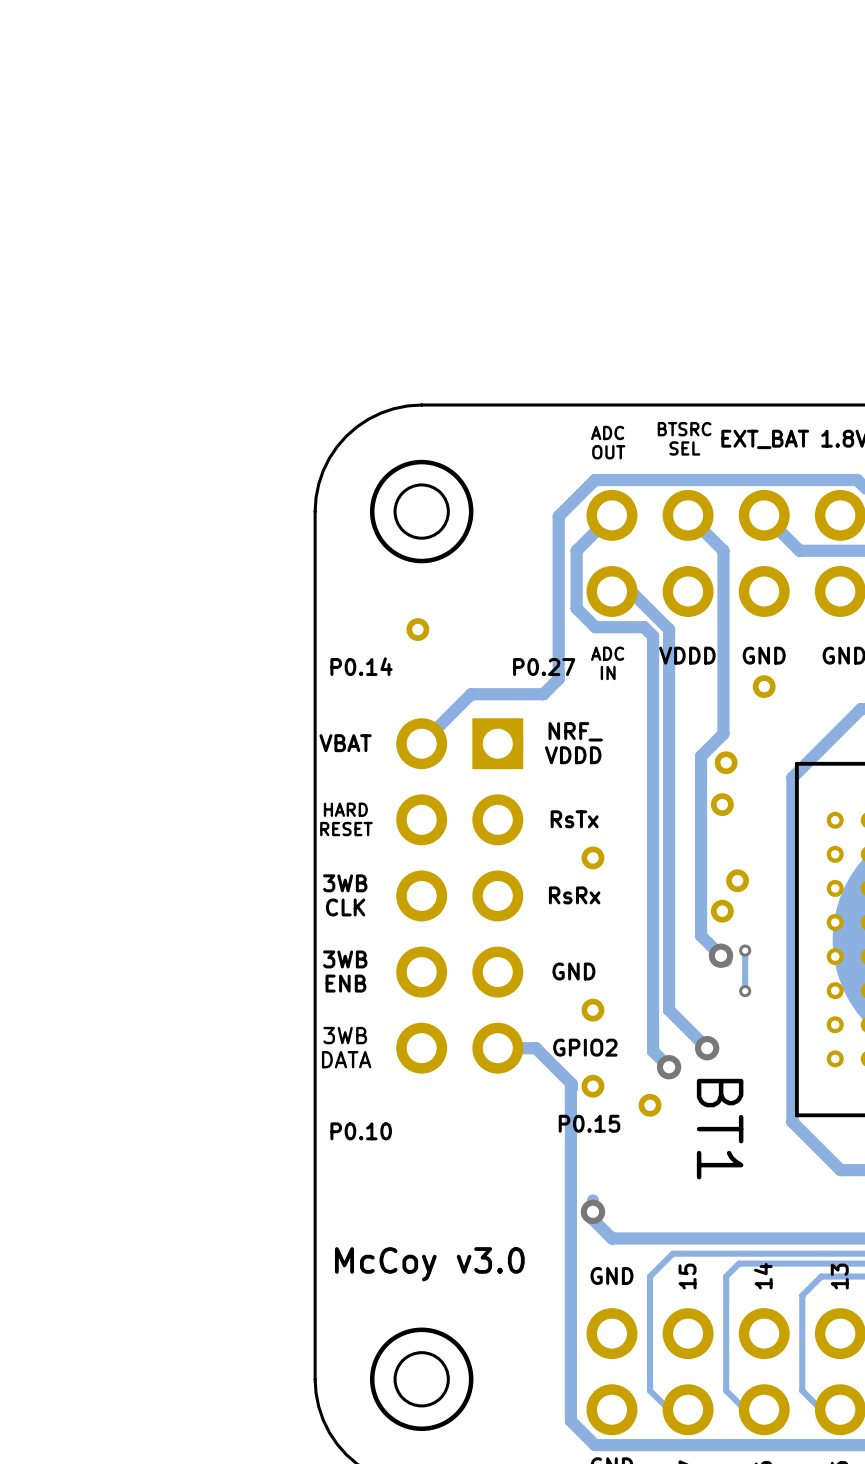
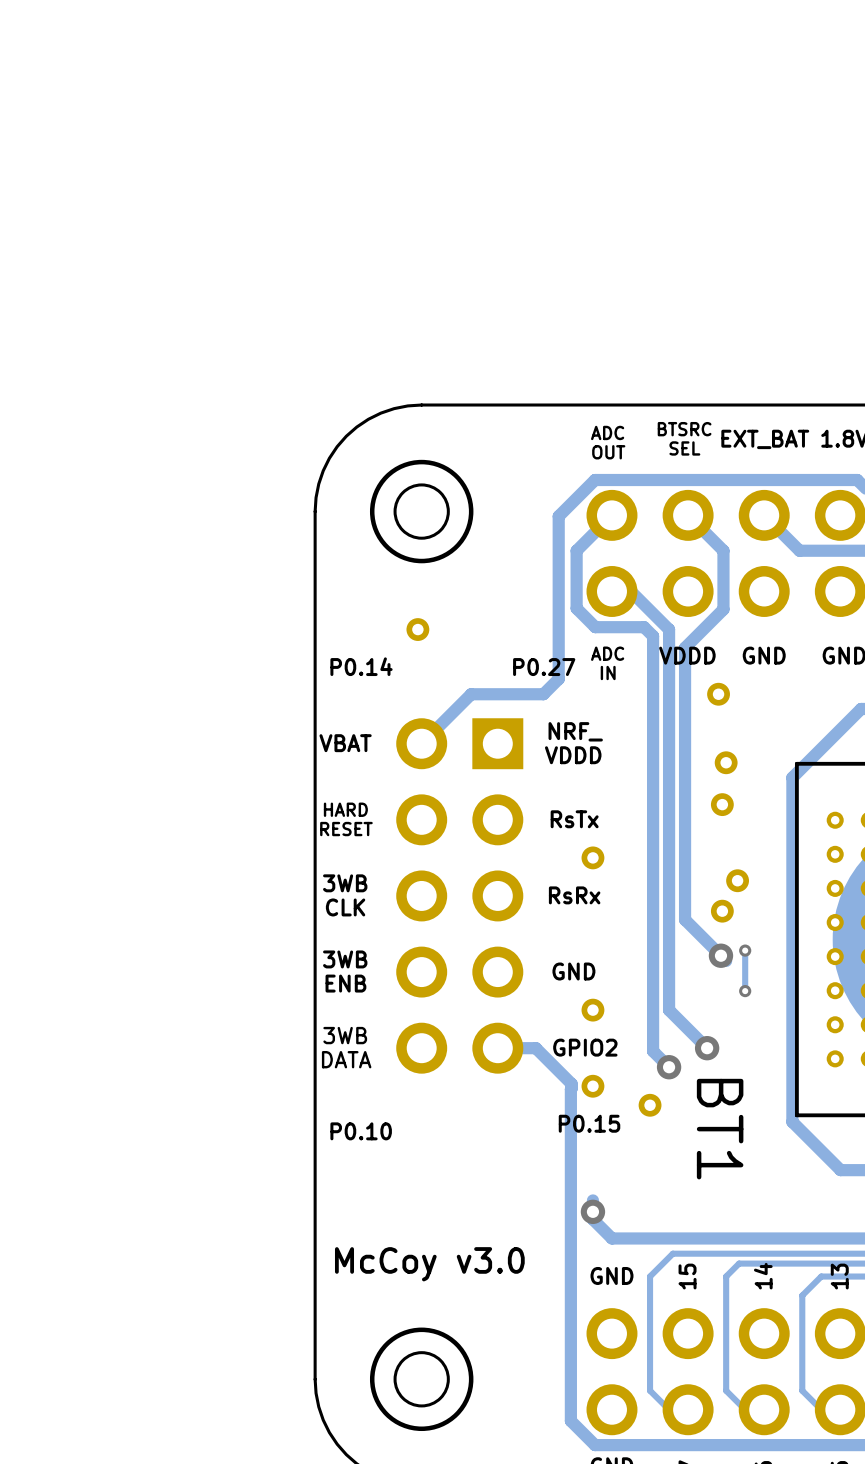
track: (723, 609) (723, 733) (701, 756) (701, 935) -> (723, 609) (685, 647) (685, 919) (701, 935)
part position: (764, 686) -> (718, 694)

